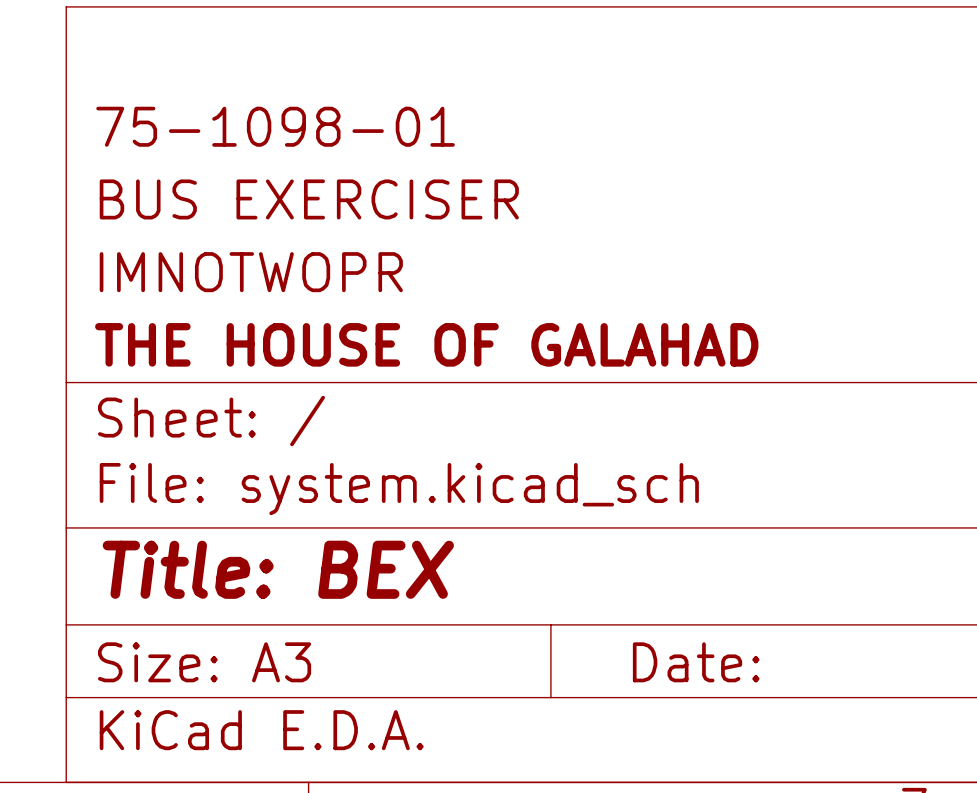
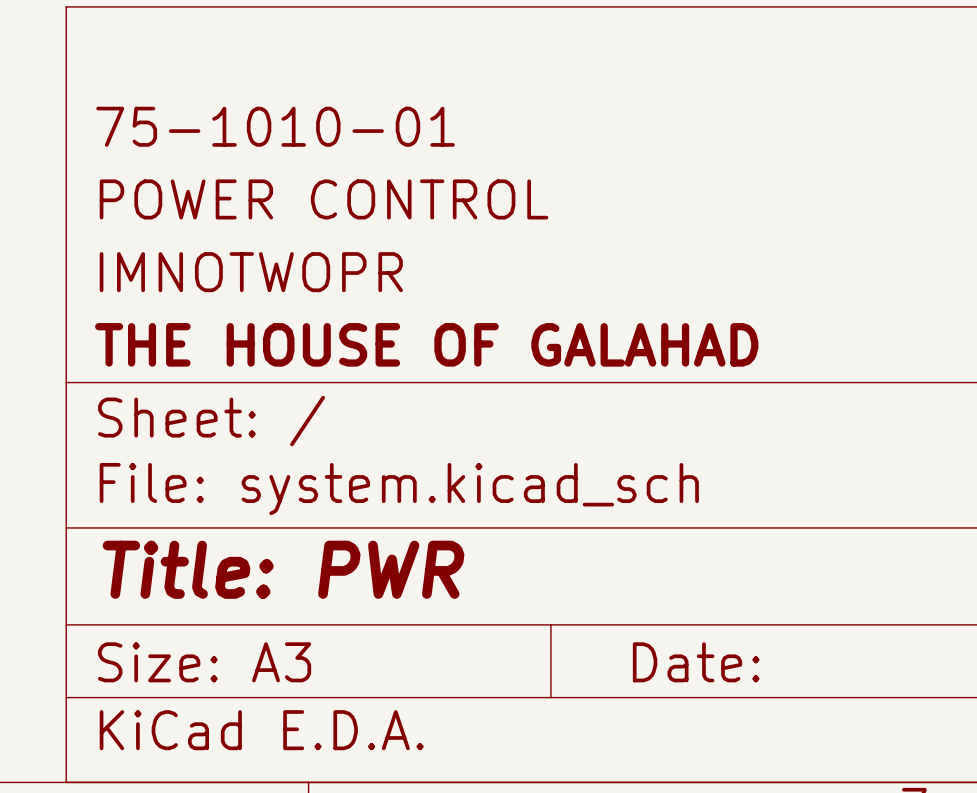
title block: 75-1098-01 (275, 126) -> 75-1010-01 (275, 126)
title block: BUS EXERCISER (309, 199) -> POWER CONTROL (324, 199)
title block: Title: BEX (278, 569) -> Title: PWR (283, 569)

